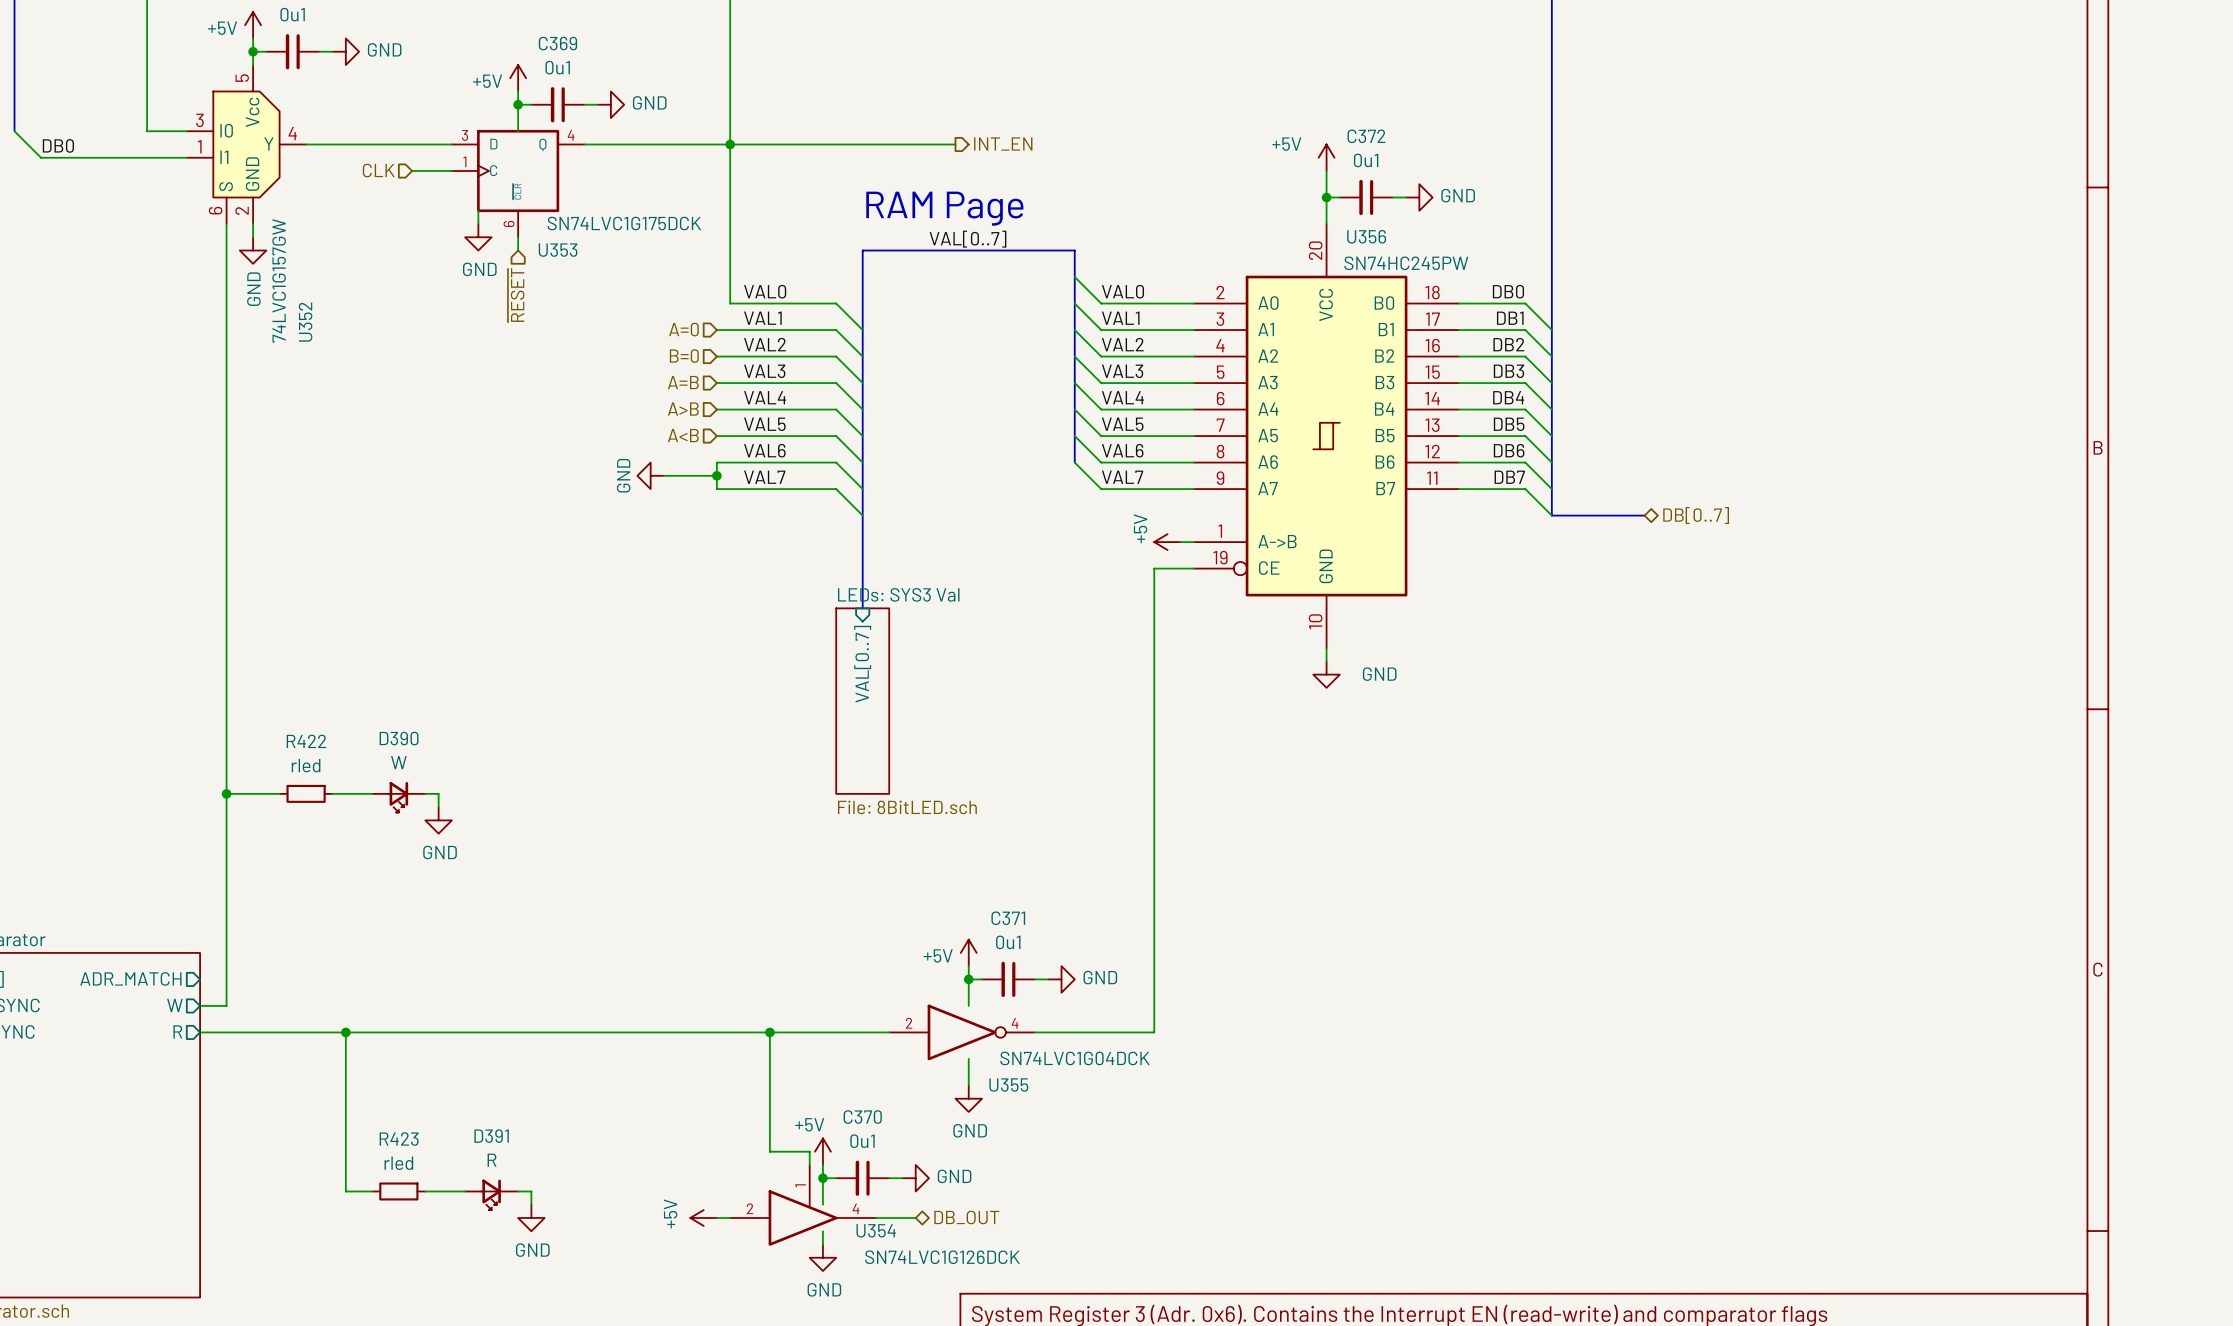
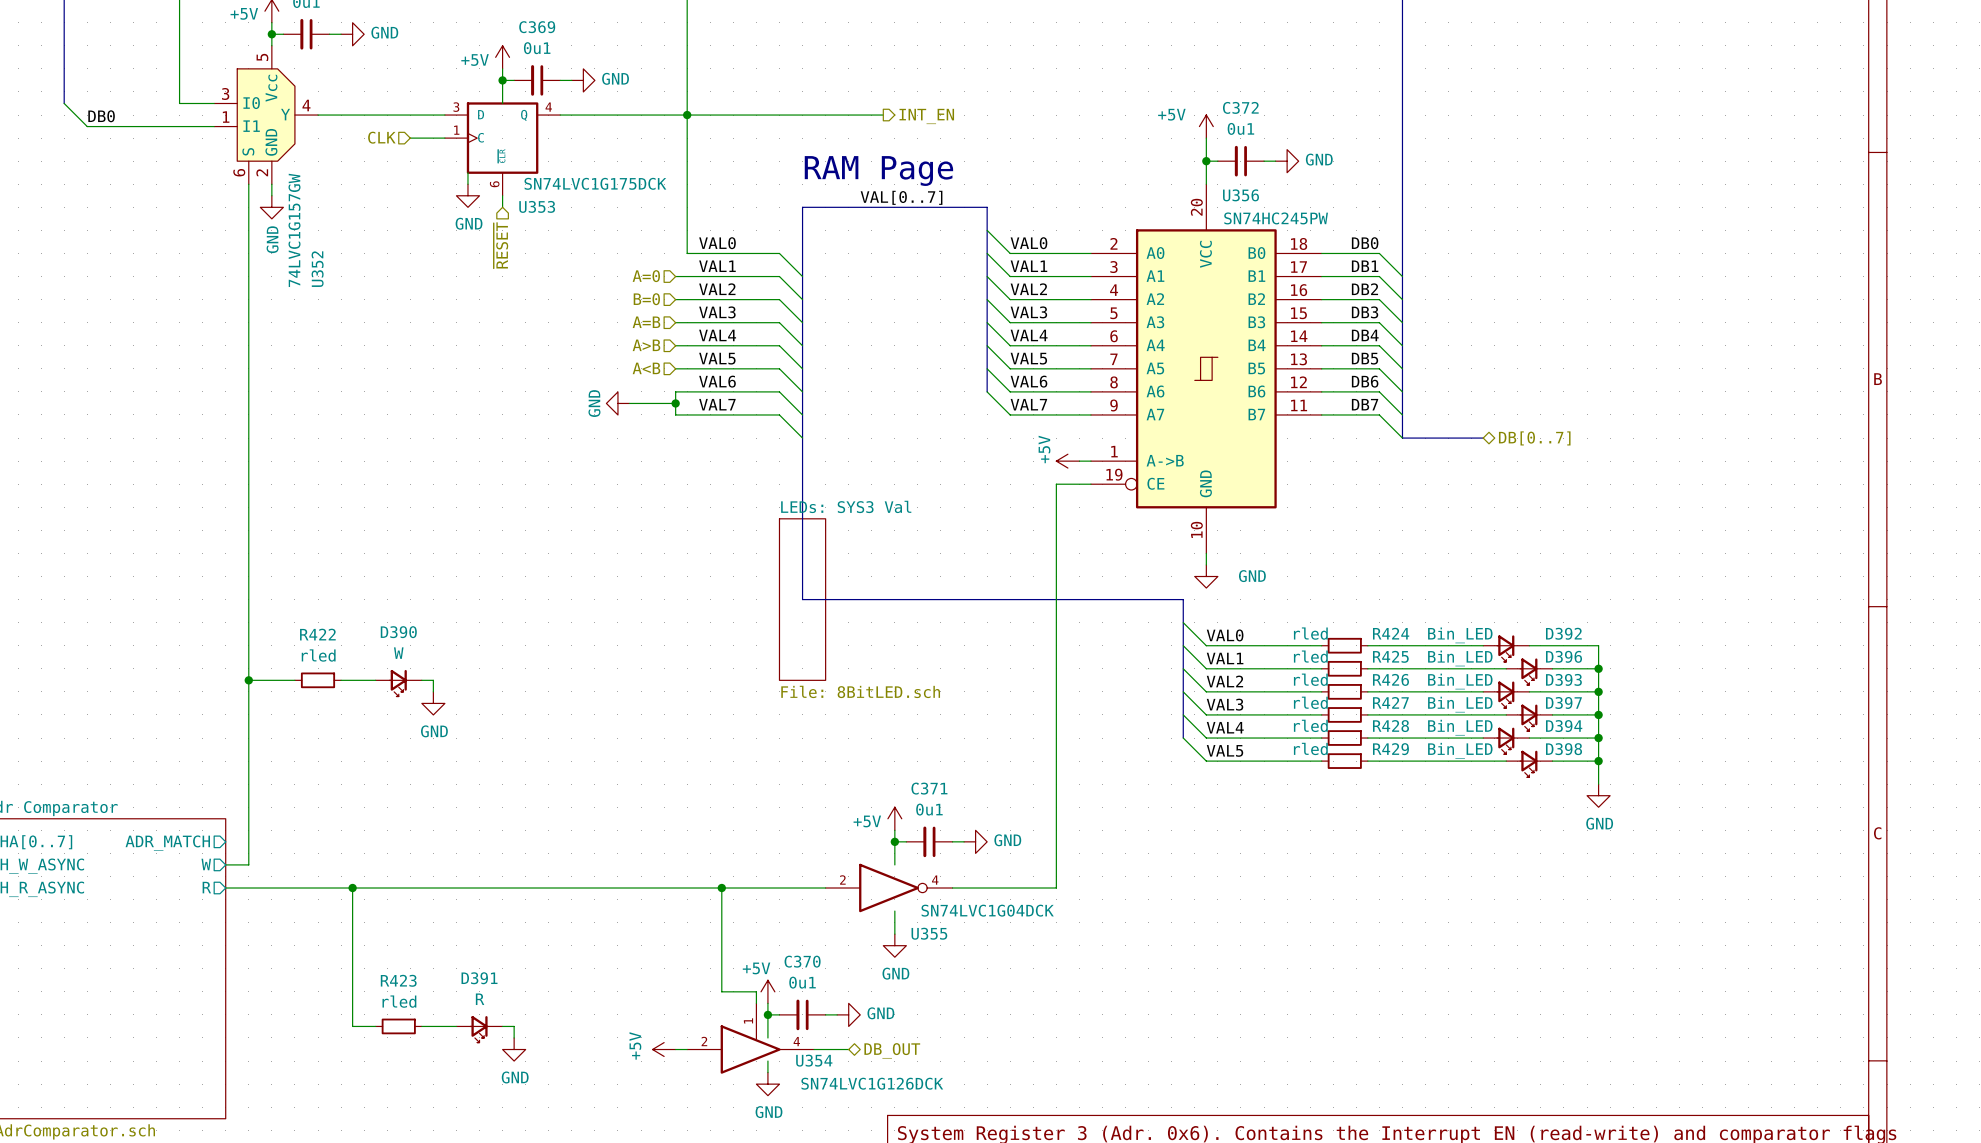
bus: none -> (802, 518) (802, 599) (1183, 599) (1183, 738)
sheet pin: VAL[0..7] (862, 664) -> none
wire: none -> (1183, 622) (1206, 645) (1321, 645)
label: none -> VAL0 (1225, 635)
wire: none -> (1183, 645) (1206, 668) (1321, 668)
R424: none -> rled (1344, 645)
wire: none -> (1367, 645) (1483, 645)
wire: none -> (1529, 645) (1598, 645) (1598, 784)
D392: none -> Bin_LED (1506, 648)
label: none -> VAL1 (1225, 658)
wire: none -> (1183, 668) (1206, 691) (1321, 691)
R425: none -> rled (1344, 668)
wire: none -> (1367, 668) (1506, 668)
wire: none -> (1552, 668) (1598, 668)
junction: none -> (1598, 668)
D396: none -> Bin_LED (1529, 671)
label: none -> VAL2 (1224, 681)
wire: none -> (1183, 691) (1206, 714) (1321, 714)
R426: none -> rled (1344, 691)
wire: none -> (1367, 691) (1483, 691)
wire: none -> (1529, 691) (1598, 691)
junction: none -> (1598, 691)
D393: none -> Bin_LED (1506, 694)
label: none -> VAL3 (1225, 704)
wire: none -> (1183, 714) (1206, 738) (1321, 738)
R427: none -> rled (1344, 714)
wire: none -> (1367, 714) (1506, 714)
wire: none -> (1552, 714) (1598, 714)
junction: none -> (1598, 714)
D397: none -> Bin_LED (1529, 717)
label: none -> VAL4 (1225, 727)
wire: none -> (1183, 738) (1206, 761) (1321, 761)
R428: none -> rled (1344, 738)
wire: none -> (1367, 738) (1483, 738)
wire: none -> (1529, 738) (1598, 738)
junction: none -> (1598, 738)
D394: none -> Bin_LED (1506, 740)
label: none -> VAL5 (1224, 750)
R429: none -> rled (1344, 761)
wire: none -> (1367, 761) (1506, 761)
wire: none -> (1552, 761) (1598, 761)
junction: none -> (1598, 761)
D398: none -> Bin_LED (1529, 763)
power symbol: none -> GND (1598, 795)

